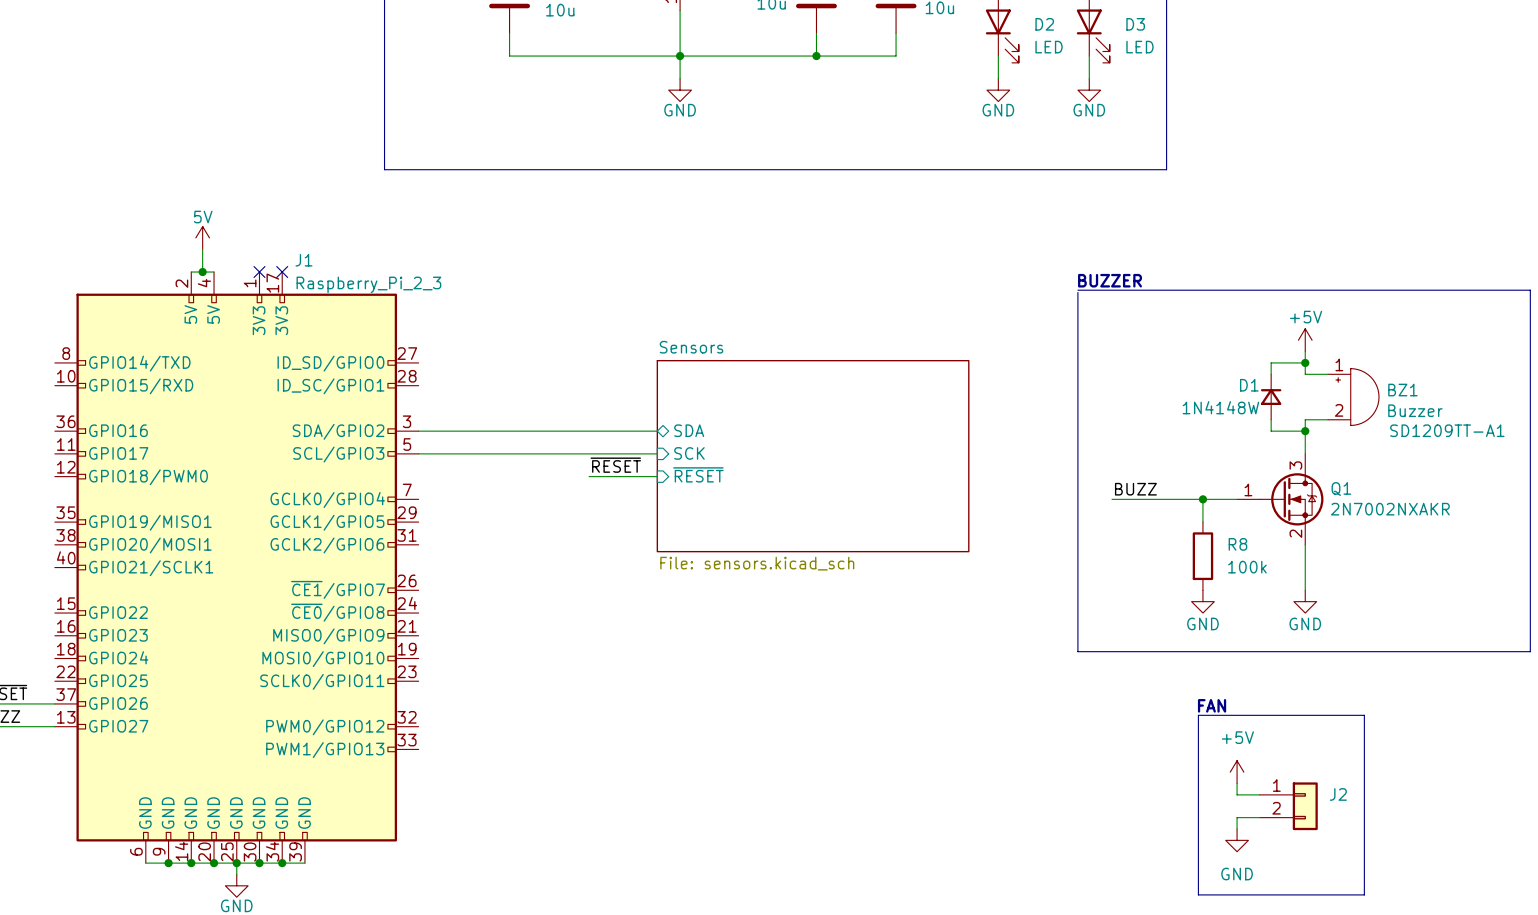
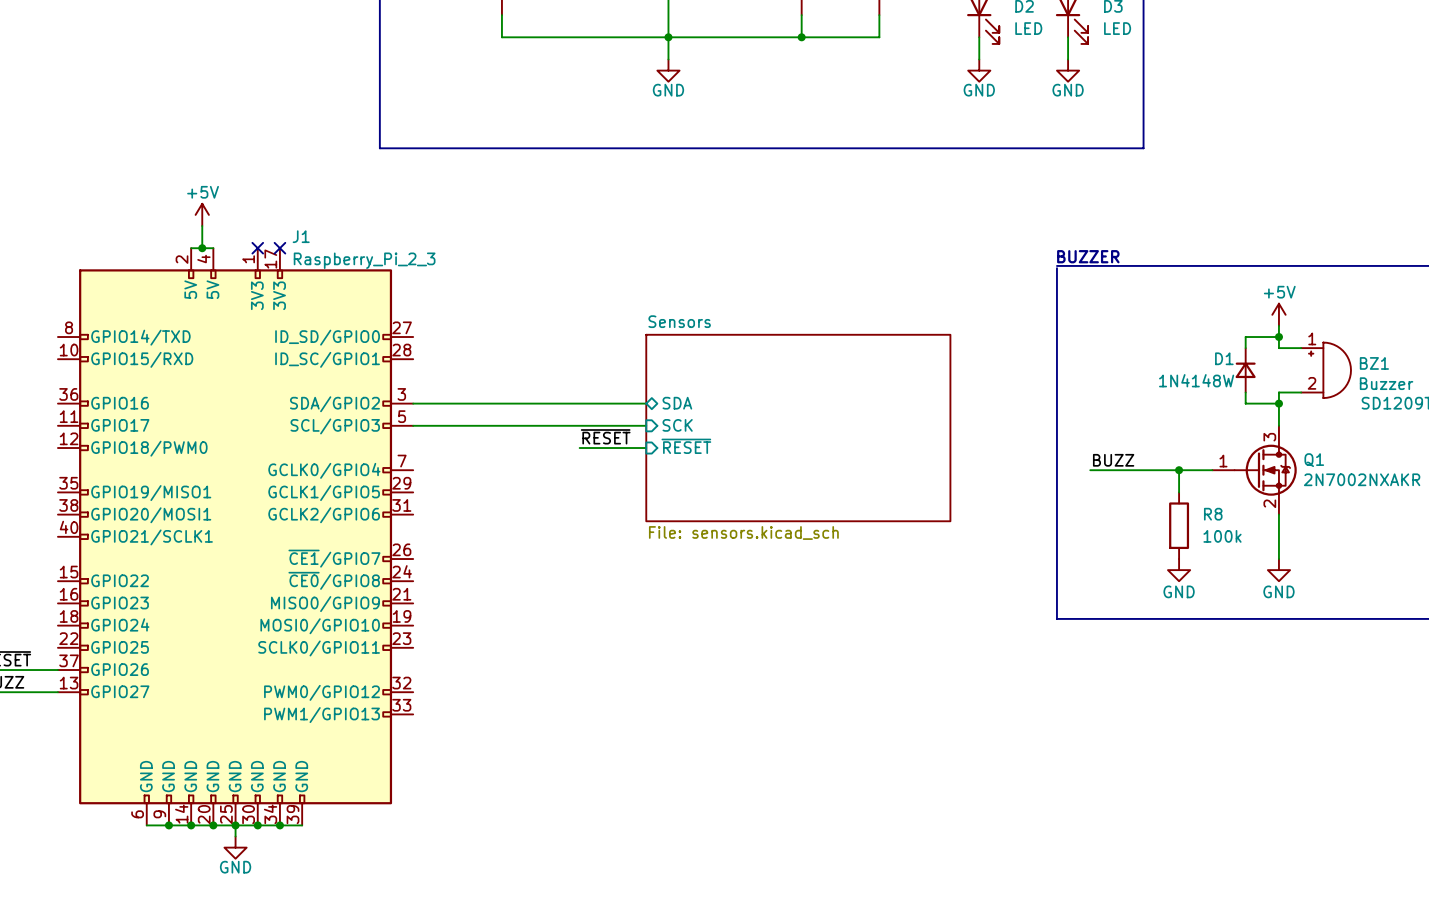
power symbol: 5V (202, 237) -> +5V (202, 214)
text: FAN (1212, 705) -> none
line: (1198, 715) (1198, 894) (1364, 894) (1364, 715) (1198, 715) -> none
power symbol: +5V (1237, 772) -> none
wire: (1237, 783) (1237, 794) (1259, 794) -> none
J2: (1288, 806) -> none
wire: (1259, 817) (1237, 817) (1237, 829) -> none
power symbol: GND (1237, 840) -> none

